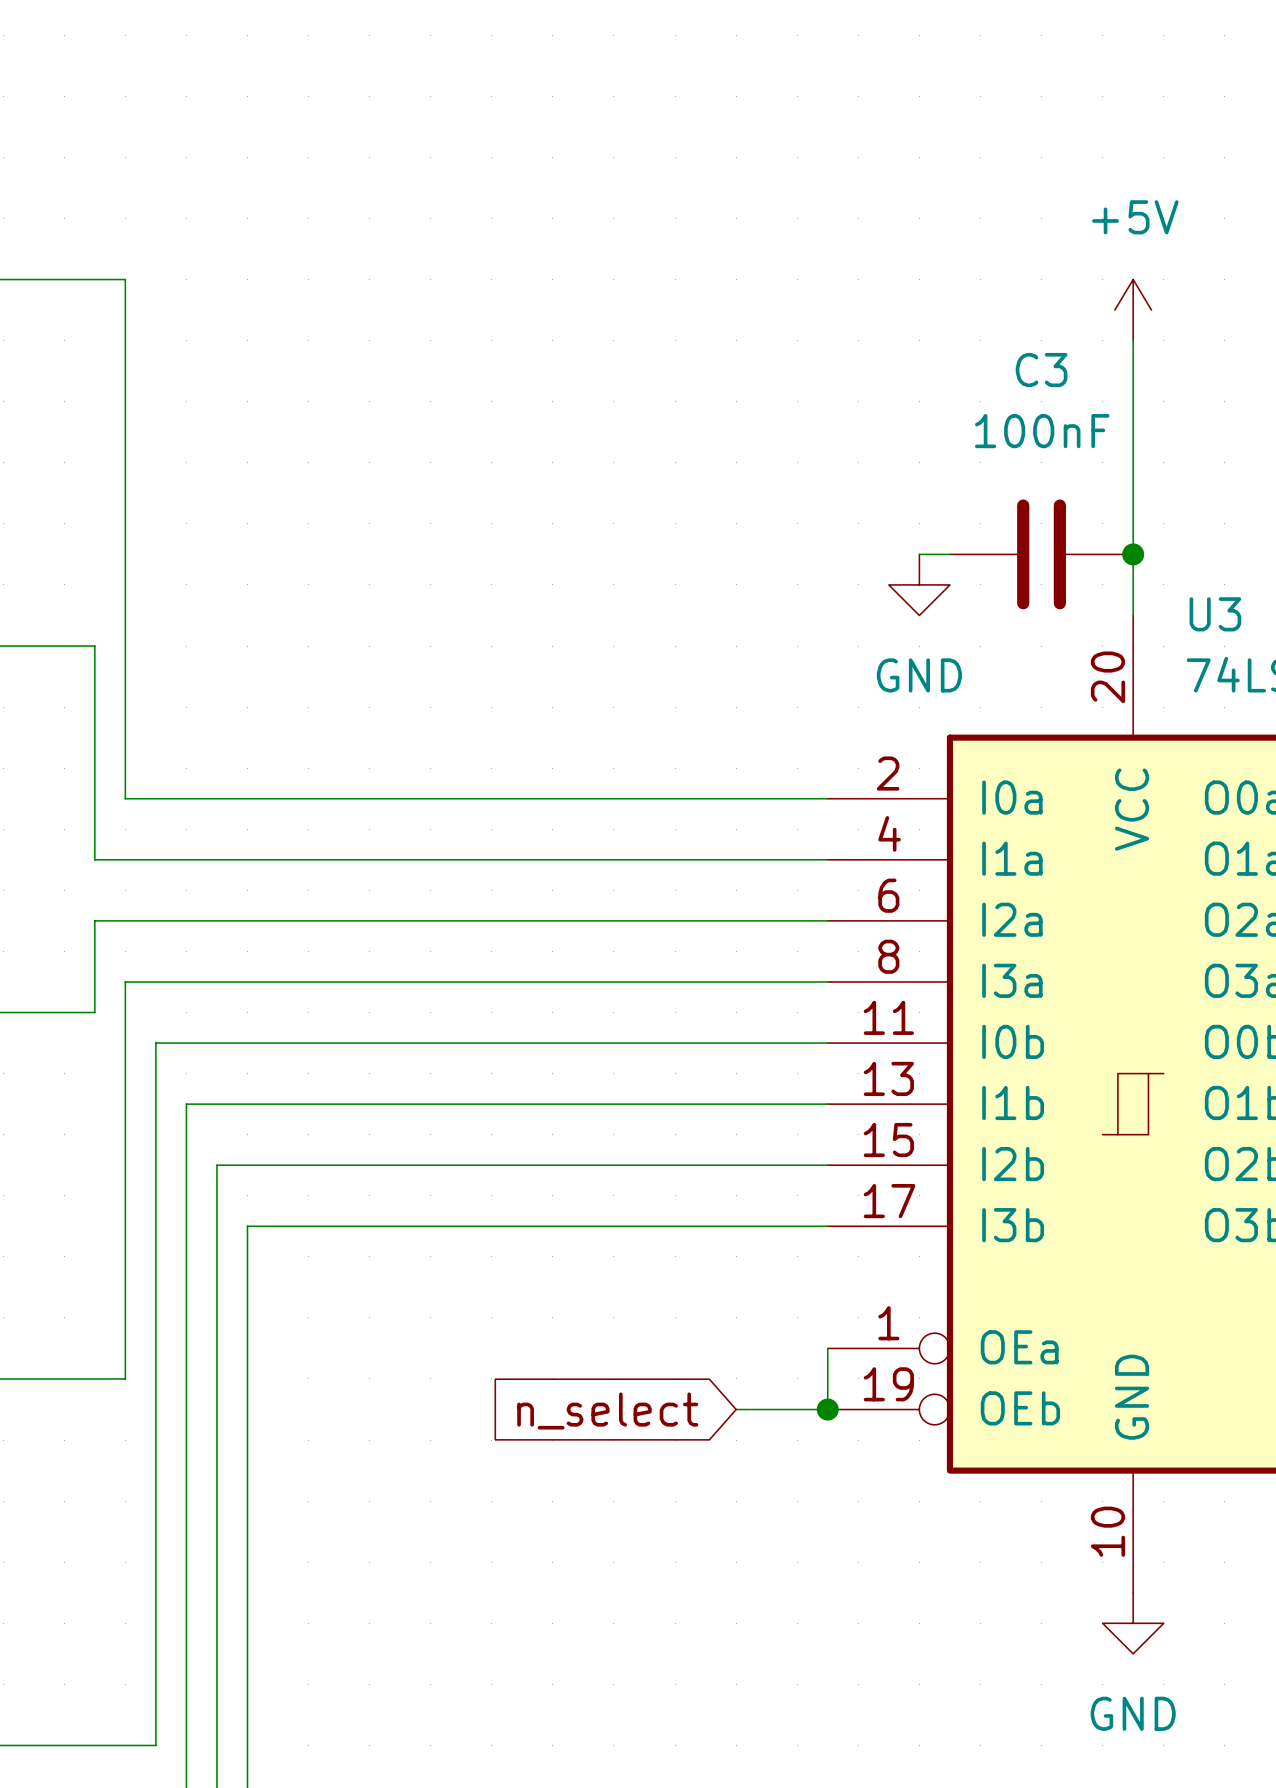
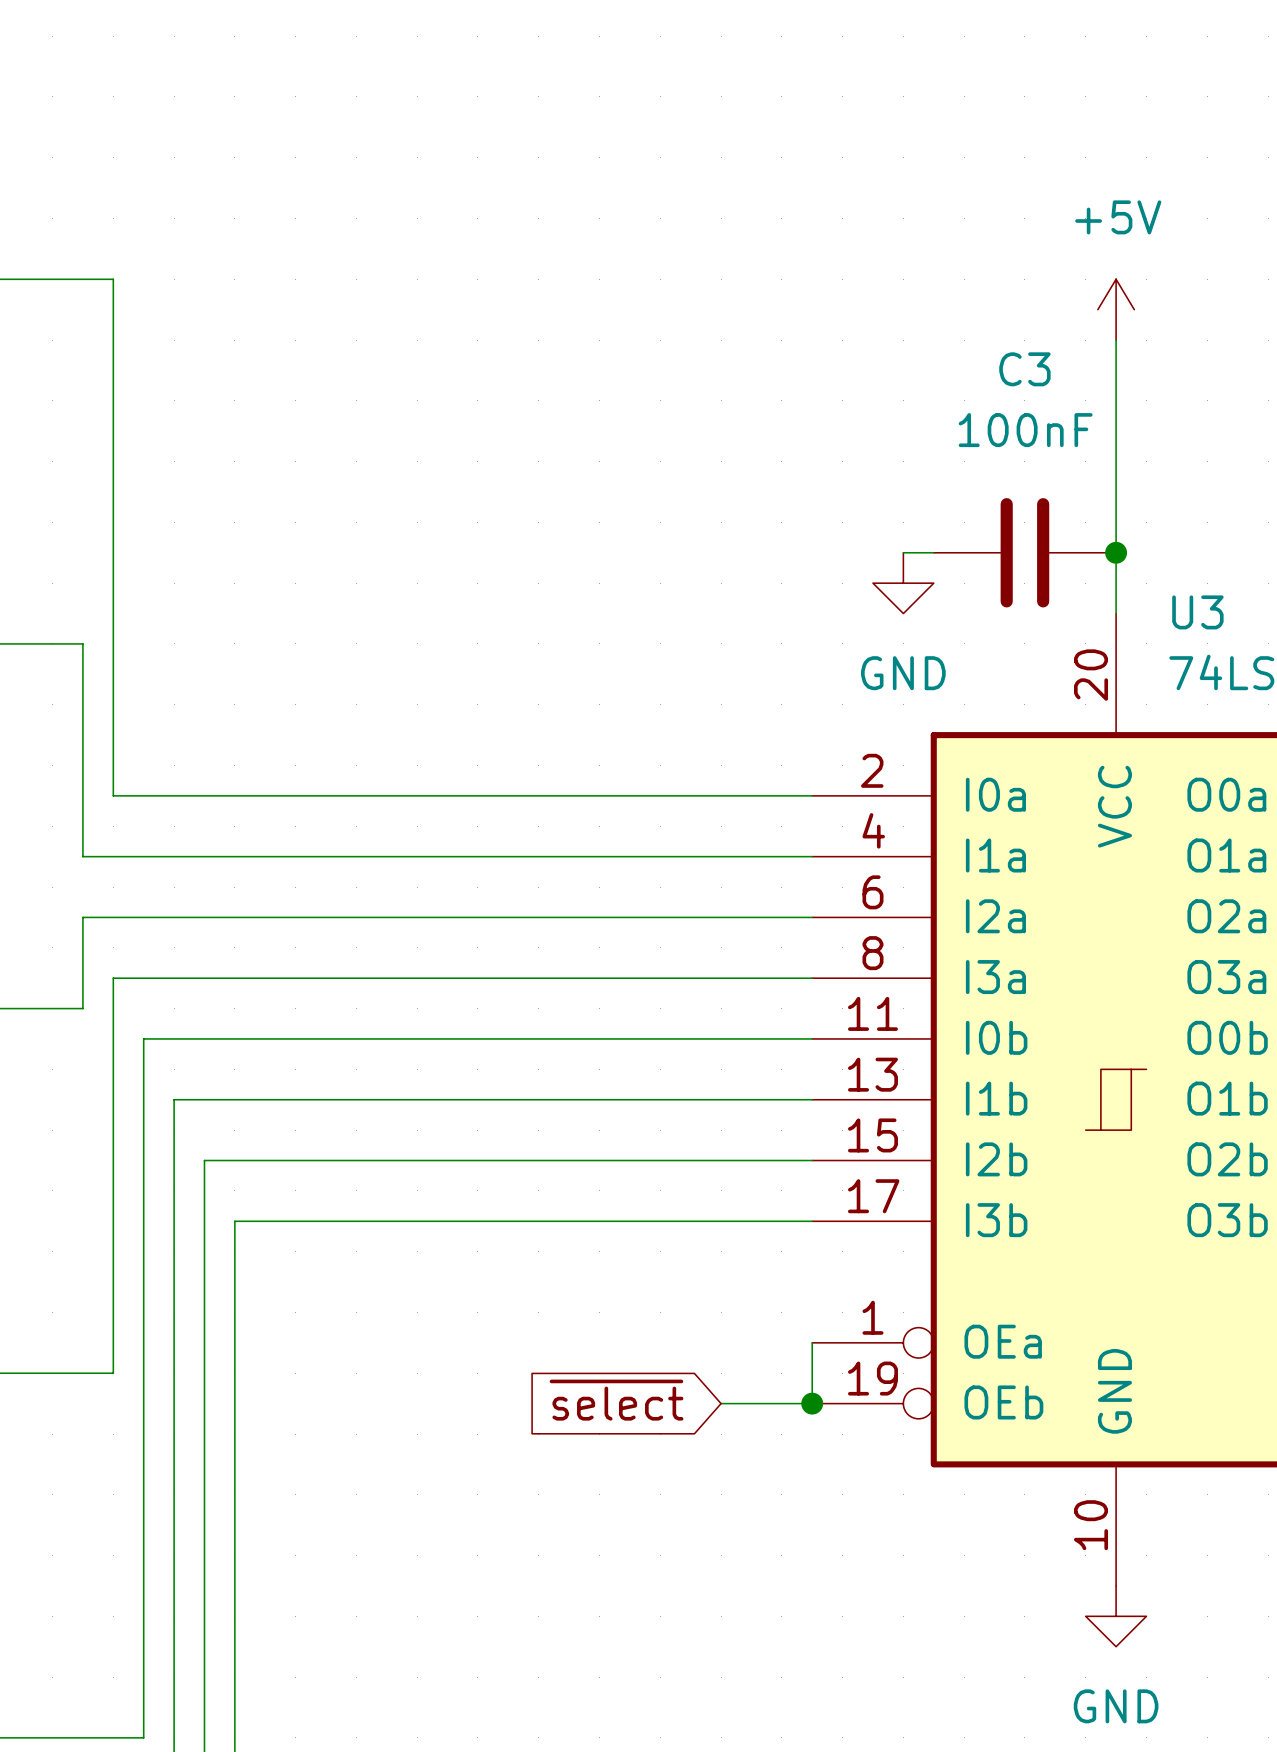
global label: n_select (607, 1410) -> ~{select} (616, 1400)

